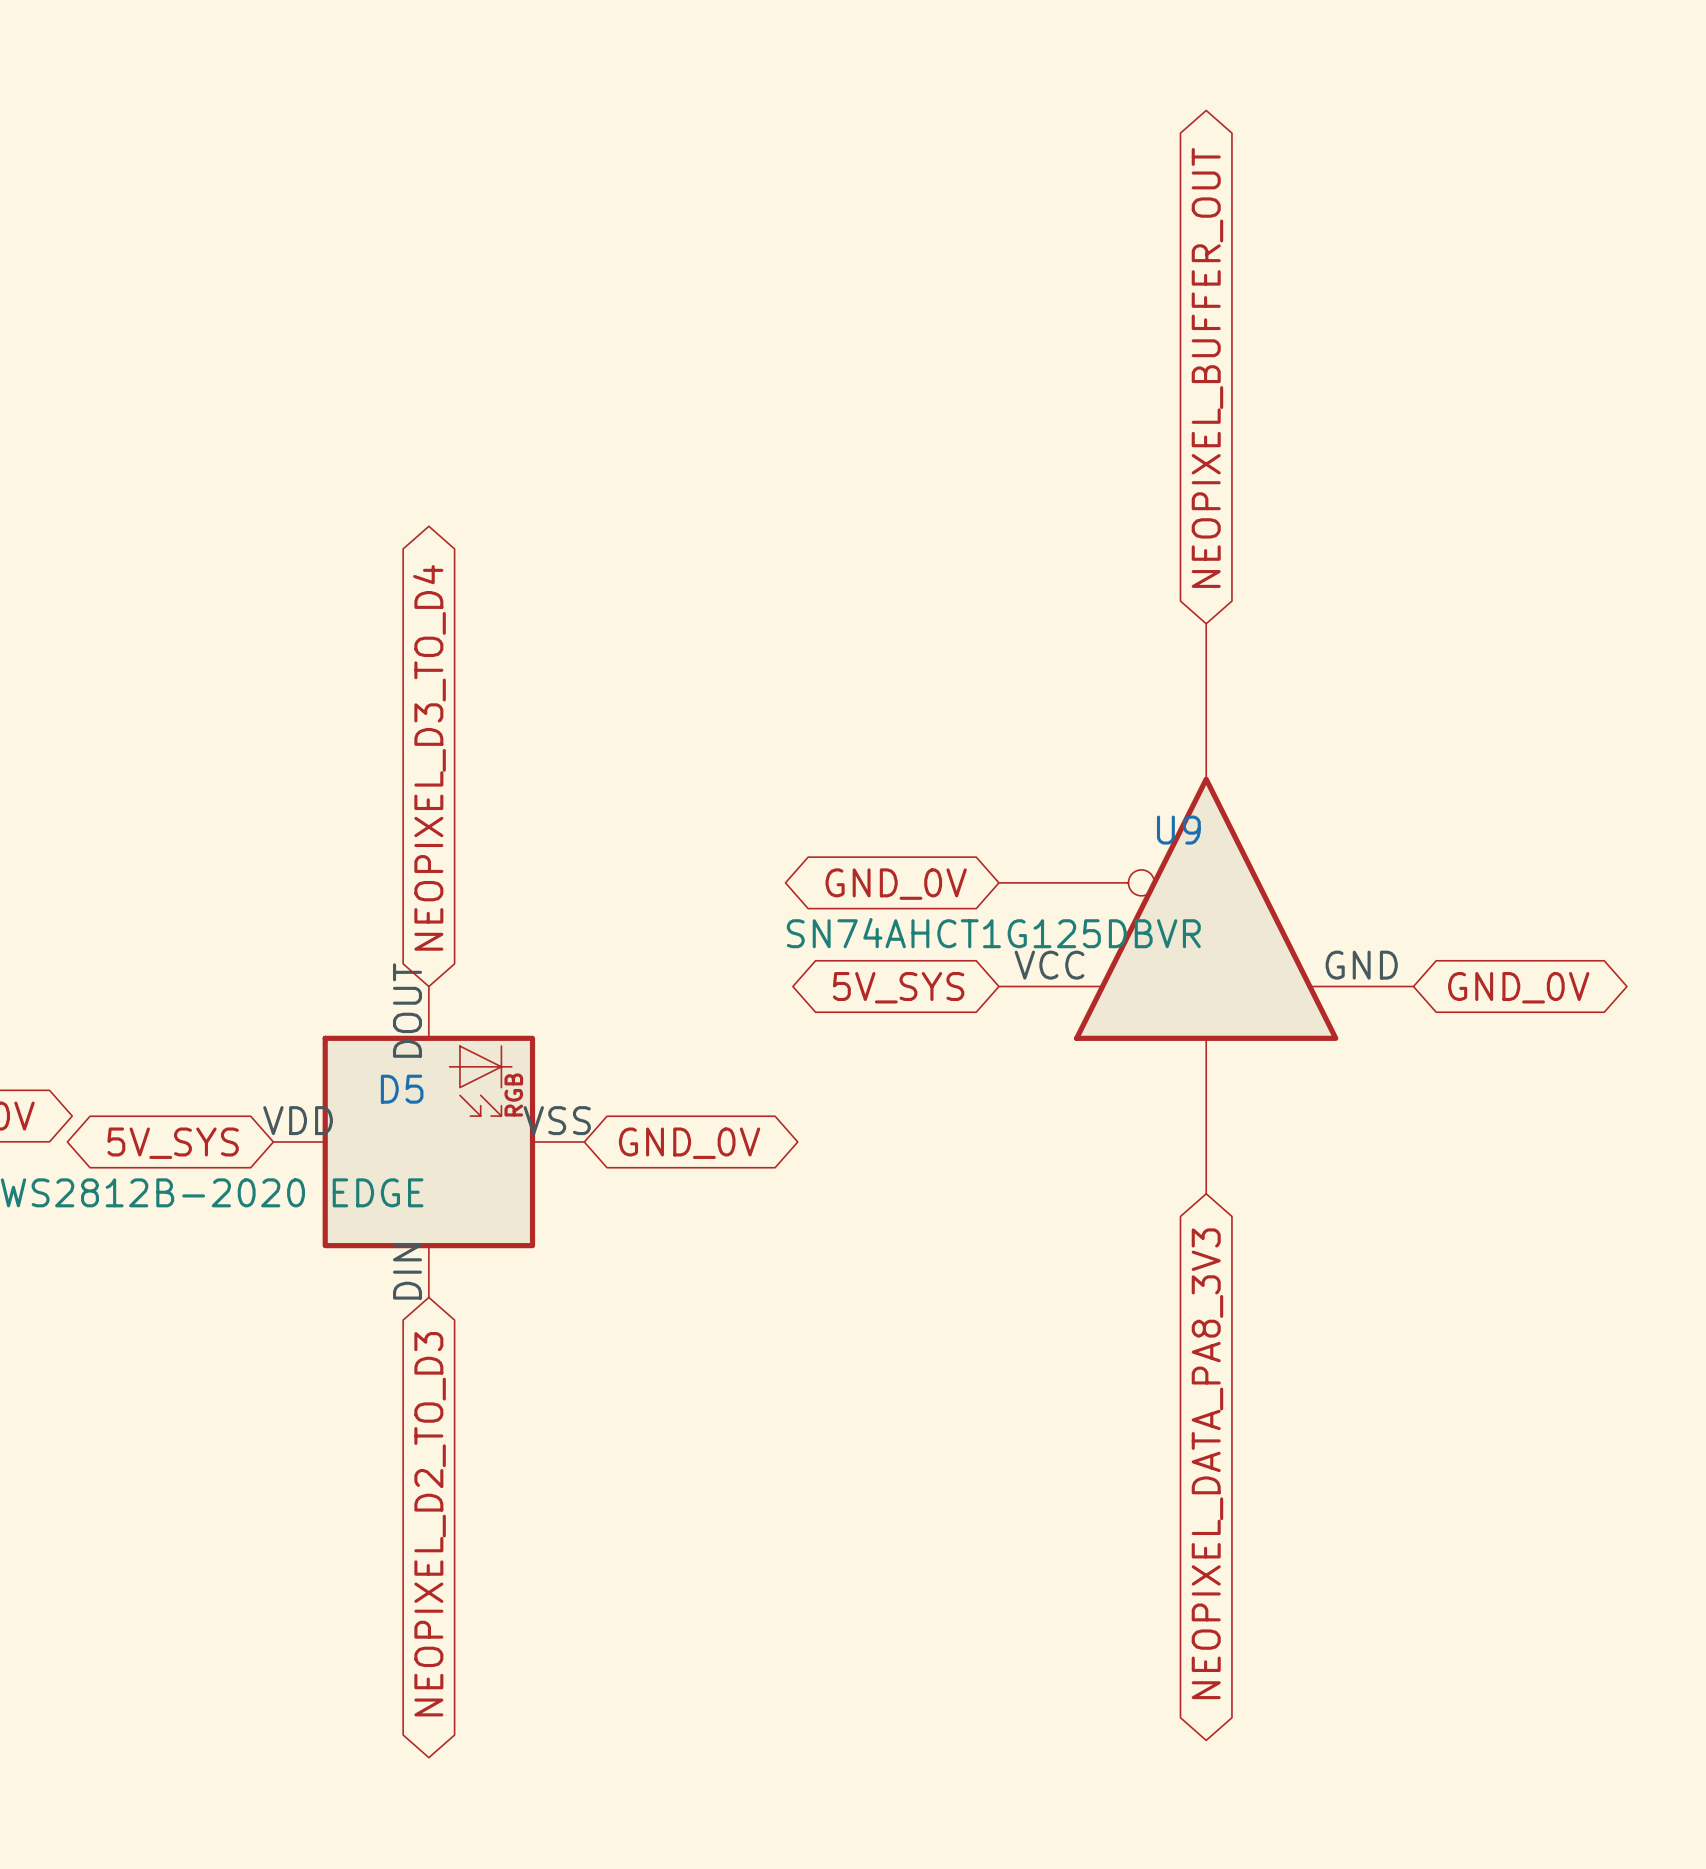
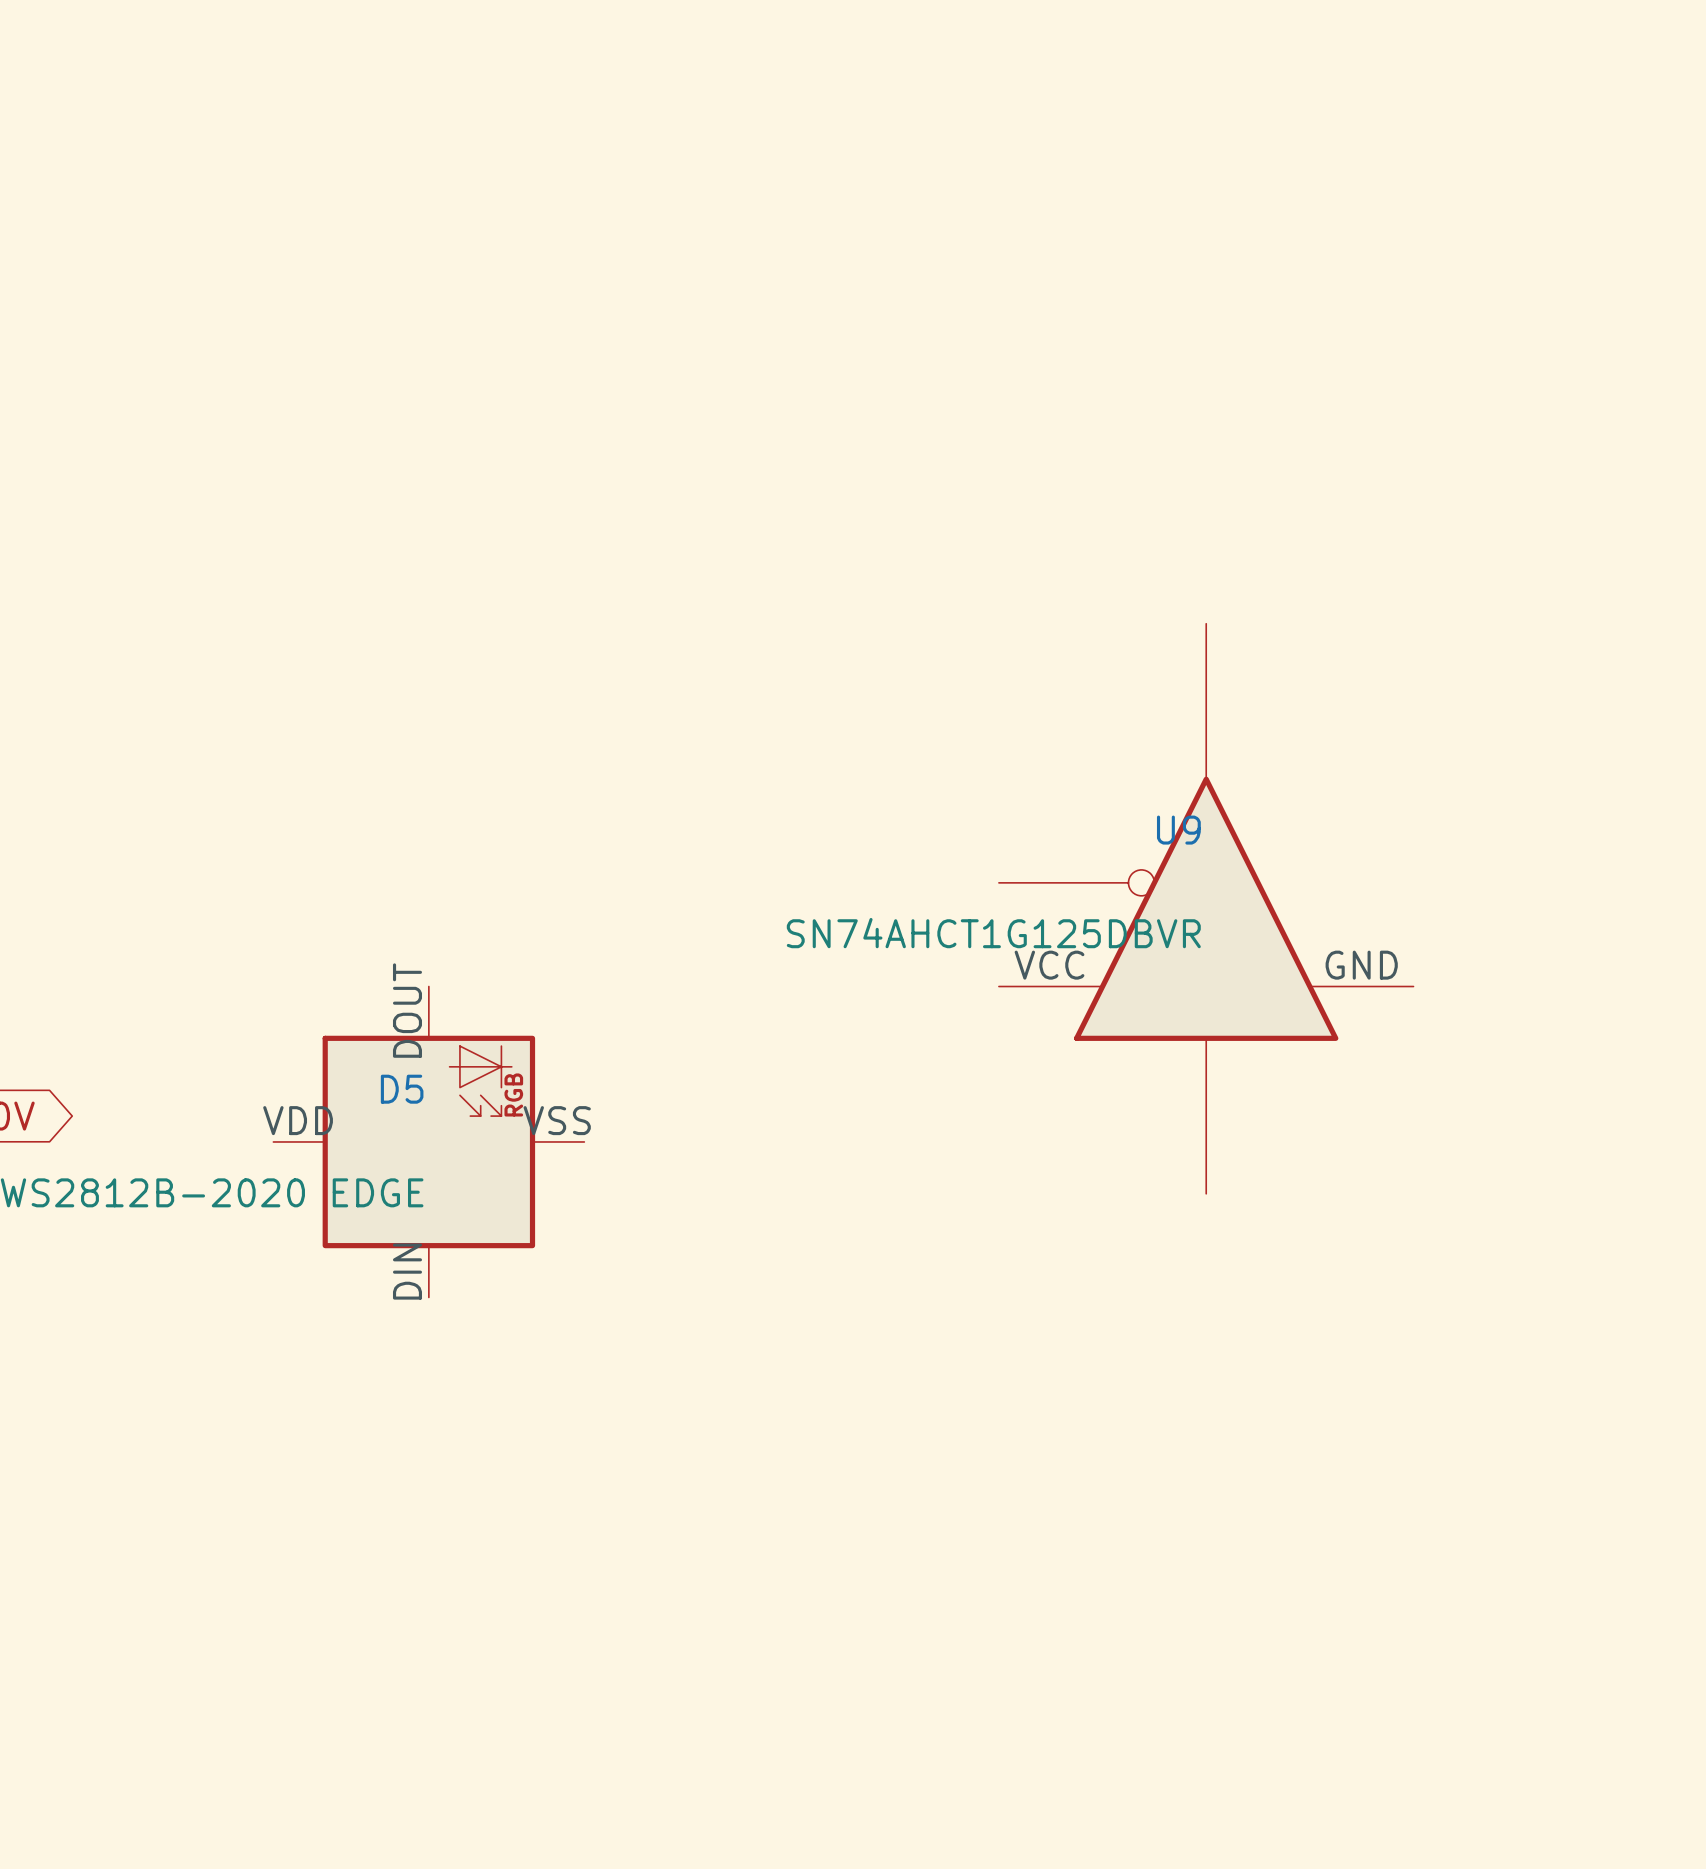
global label: NEOPIXEL_BUFFER_OUT (1207, 367) -> none
global label: NEOPIXEL_D3_TO_D4 (429, 757) -> none
global label: GND_0V (896, 884) -> none
global label: 5V_SYS (898, 987) -> none
global label: GND_0V (1518, 987) -> none
global label: 5V_SYS (173, 1143) -> none
global label: GND_0V (689, 1143) -> none
global label: NEOPIXEL_DATA_PA8_3V3 (1207, 1463) -> none
global label: NEOPIXEL_D2_TO_D3 (430, 1524) -> none

